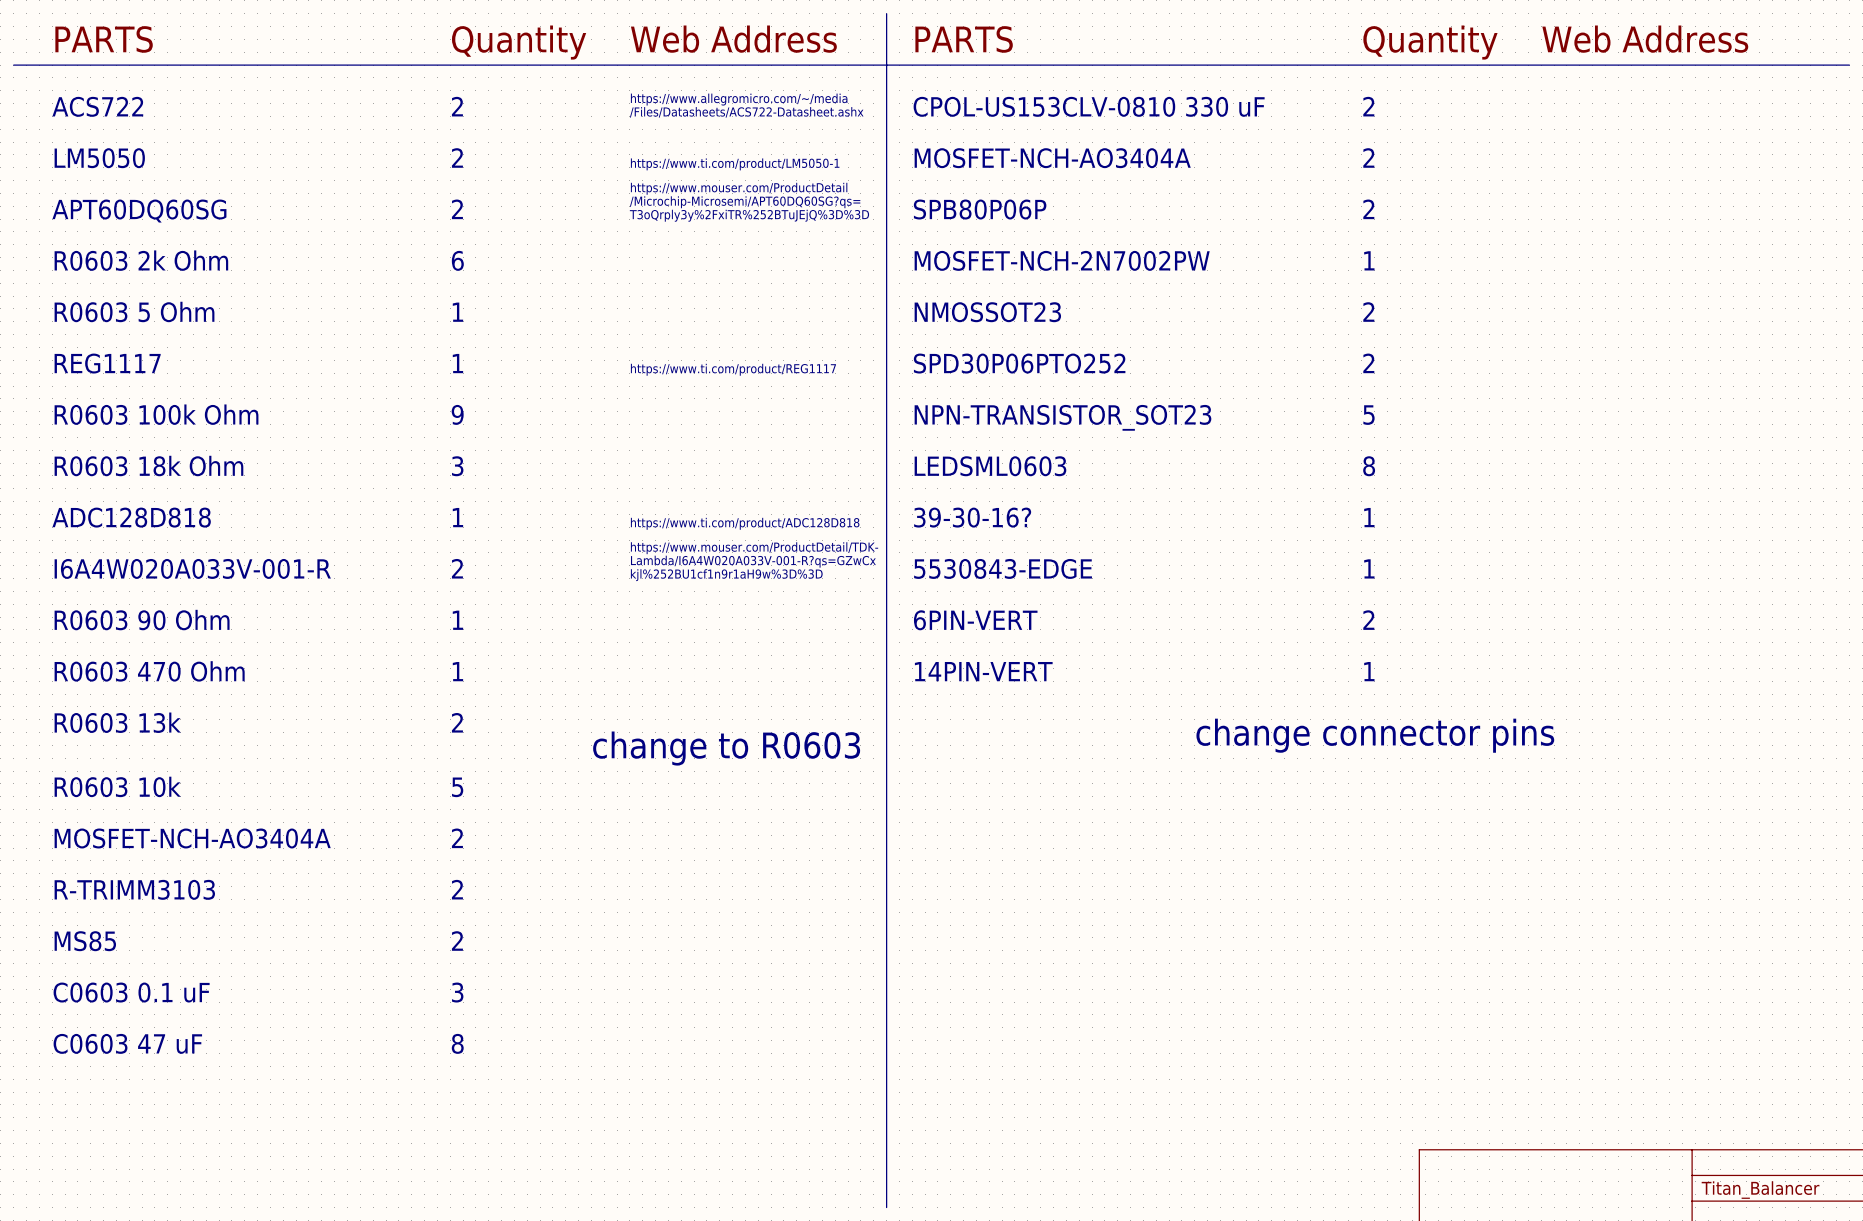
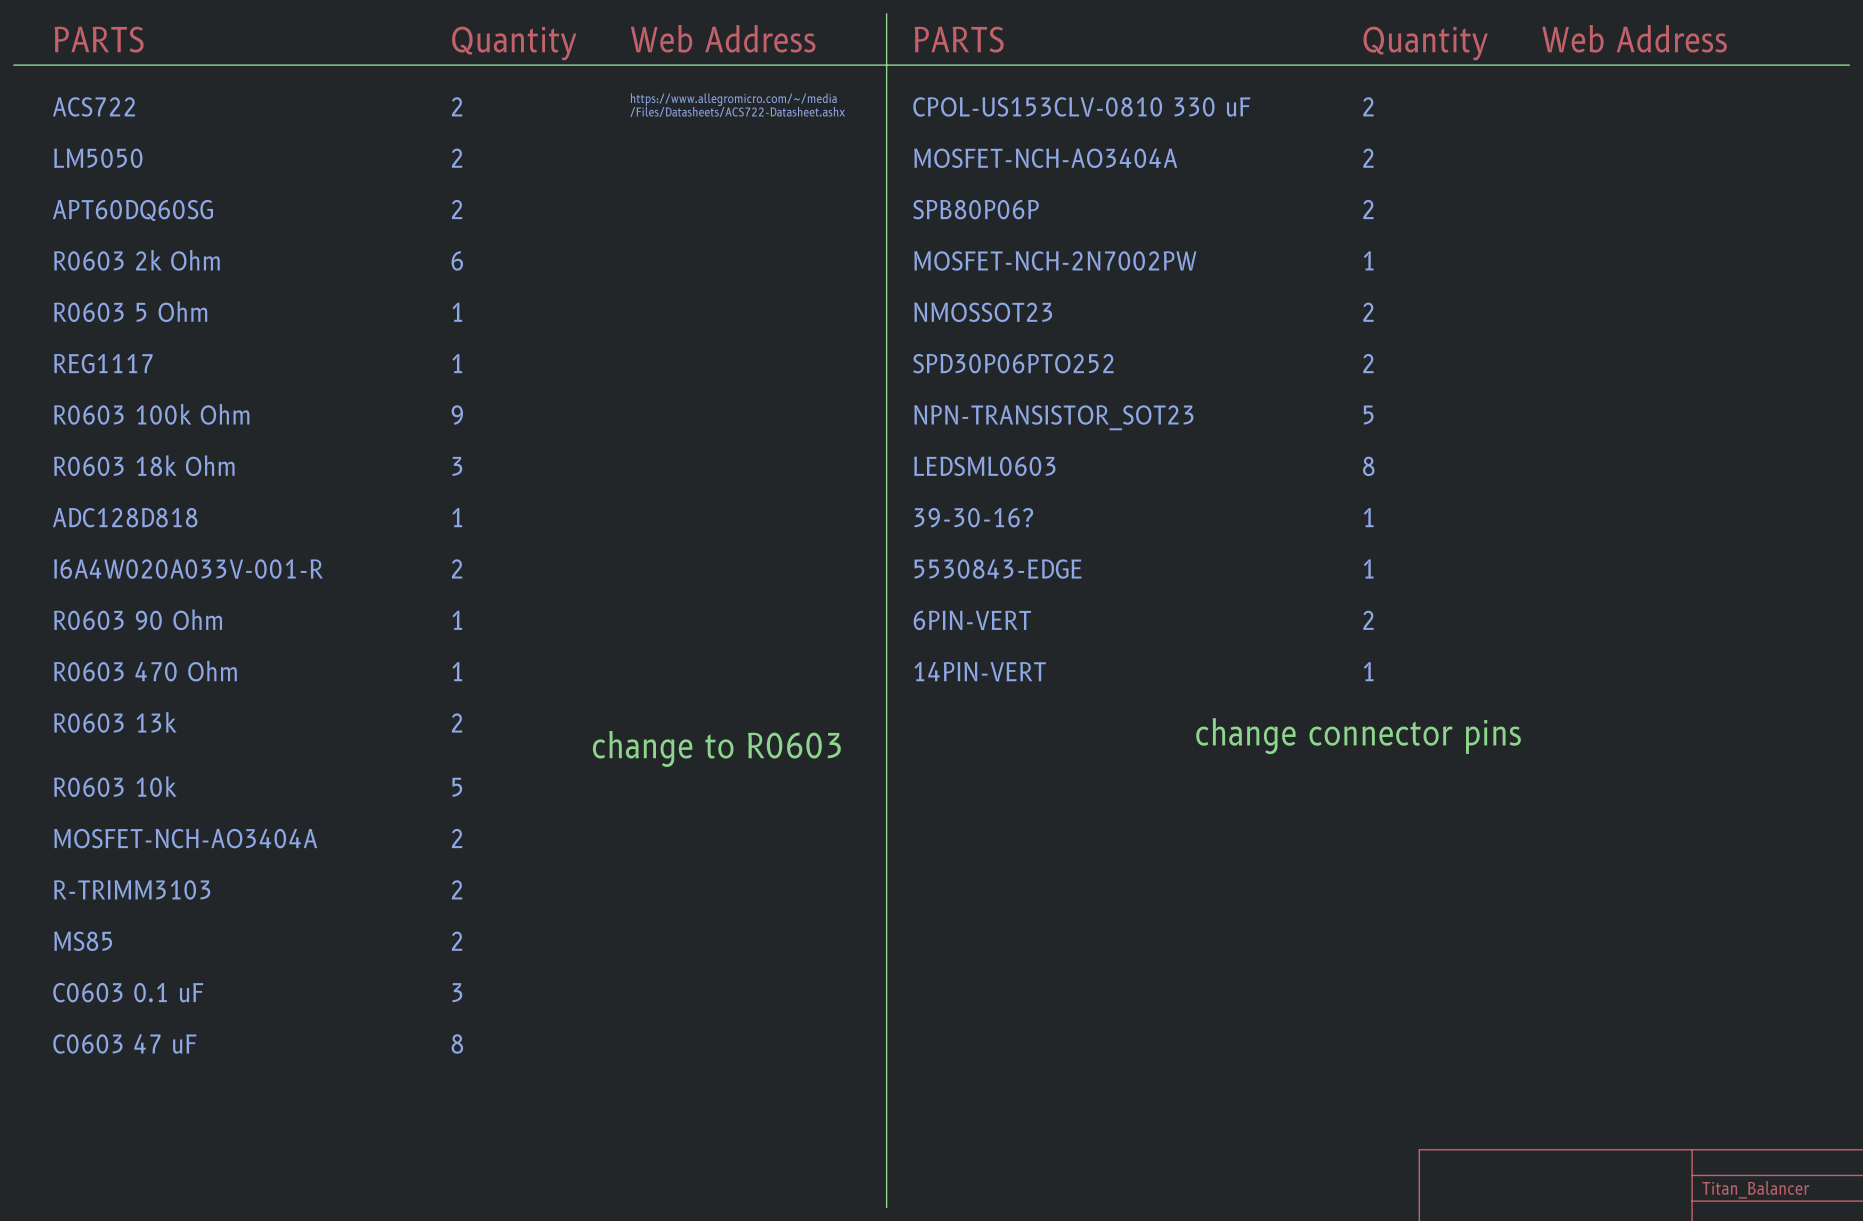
text: https://www.ti.com/product/LM5050-1 (735, 164) -> none
text: https://www.mouser.com/ProductDetail (739, 188) -> none
text: /Microchip-Microsemi/APT60DQ60SG?qs= (745, 202) -> none
text: T3oQrply3y%2FxiTR%252BTuJEjQ%3D%3D (749, 215) -> none
text: https://www.ti.com/product/REG1117 (733, 369) -> none
text: https://www.ti.com/product/ADC128D818 (745, 523) -> none
text: https://www.mouser.com/ProductDetail/TDK- (754, 548) -> none
text: Lambda/I6A4W020A033V-001-R?qs=GZwCx (753, 561) -> none
text: kjl%252BU1cf1n9r1aH9w%3D%3D (726, 575) -> none

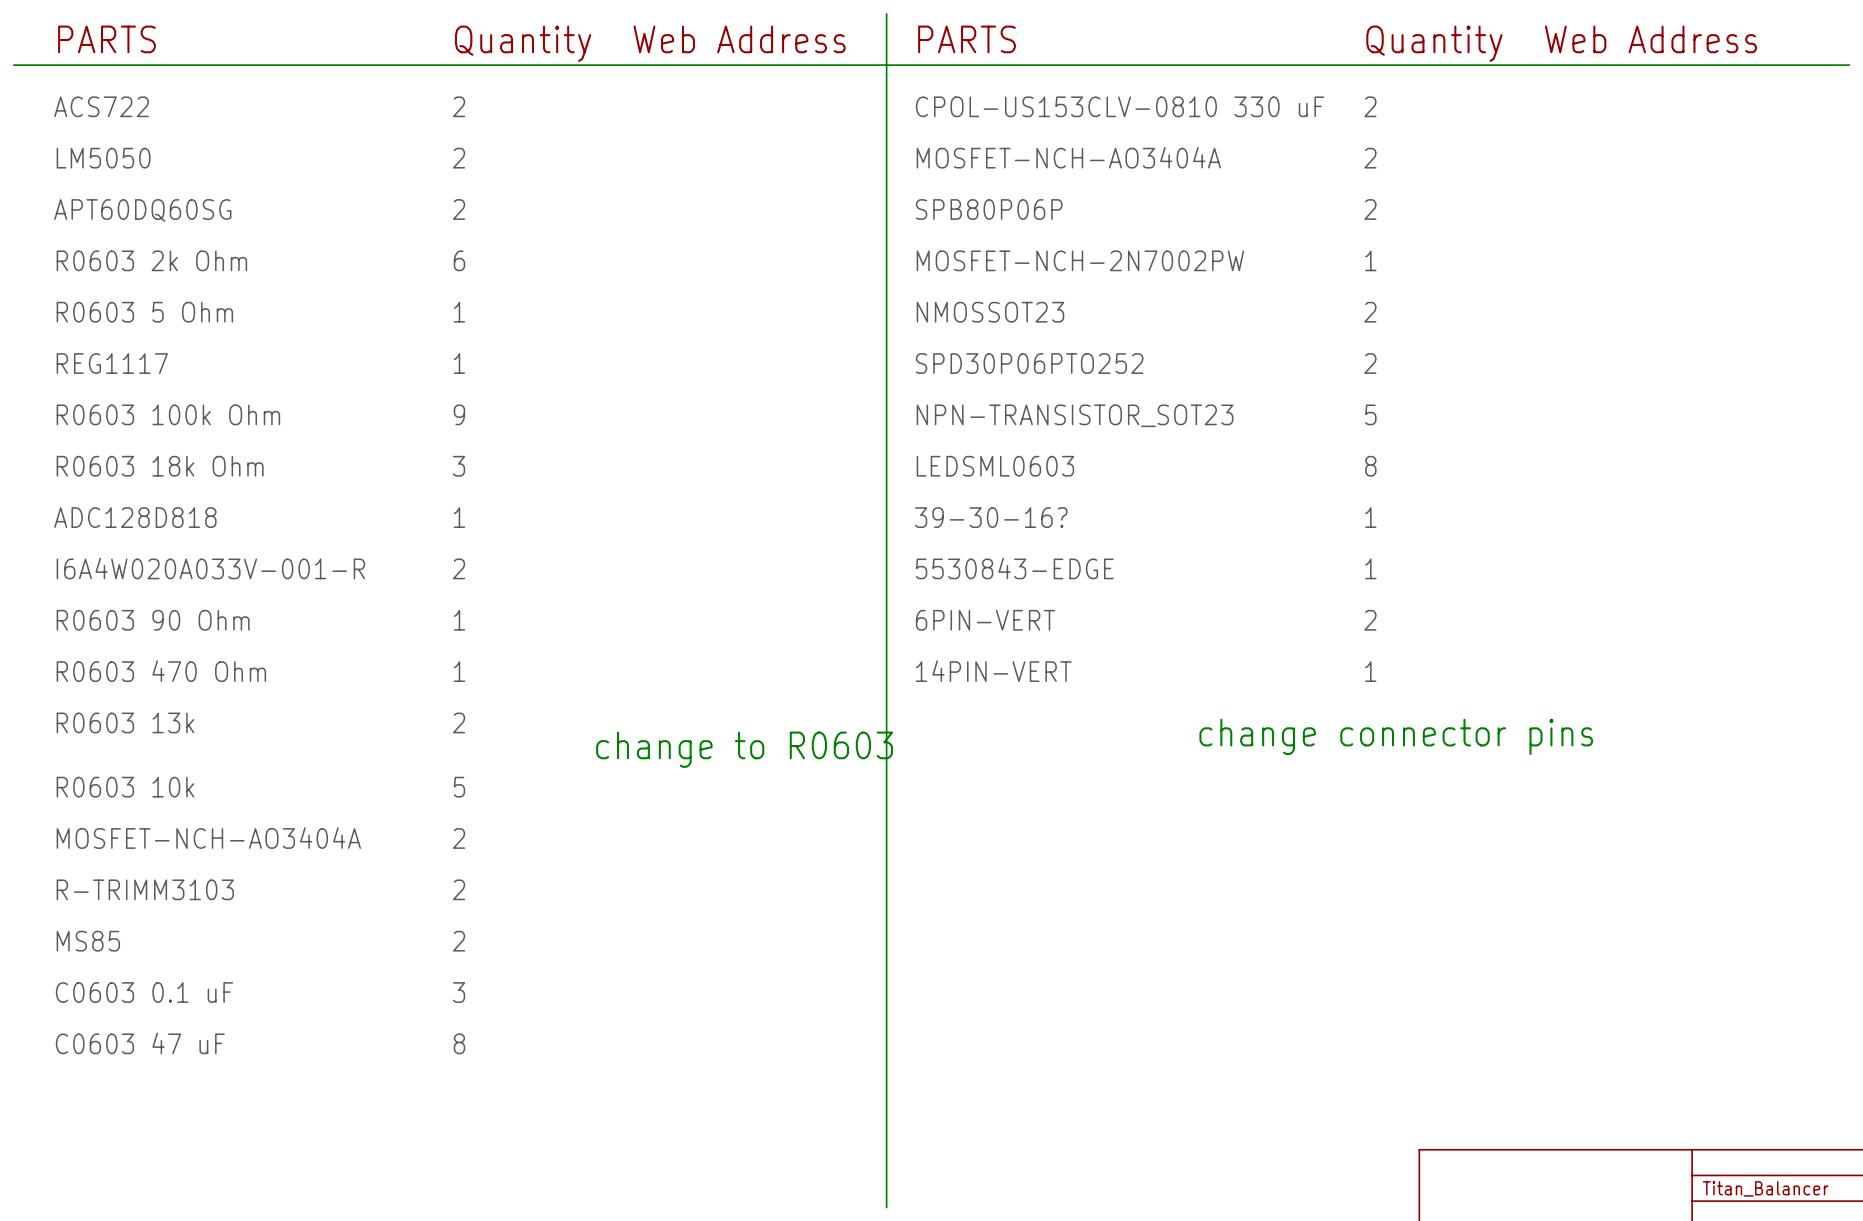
text: https://www.allegromicro.com/~/media (733, 99) -> none
text: /Files/Datasheets/ACS722-Datasheet.ashx (737, 111) -> none

